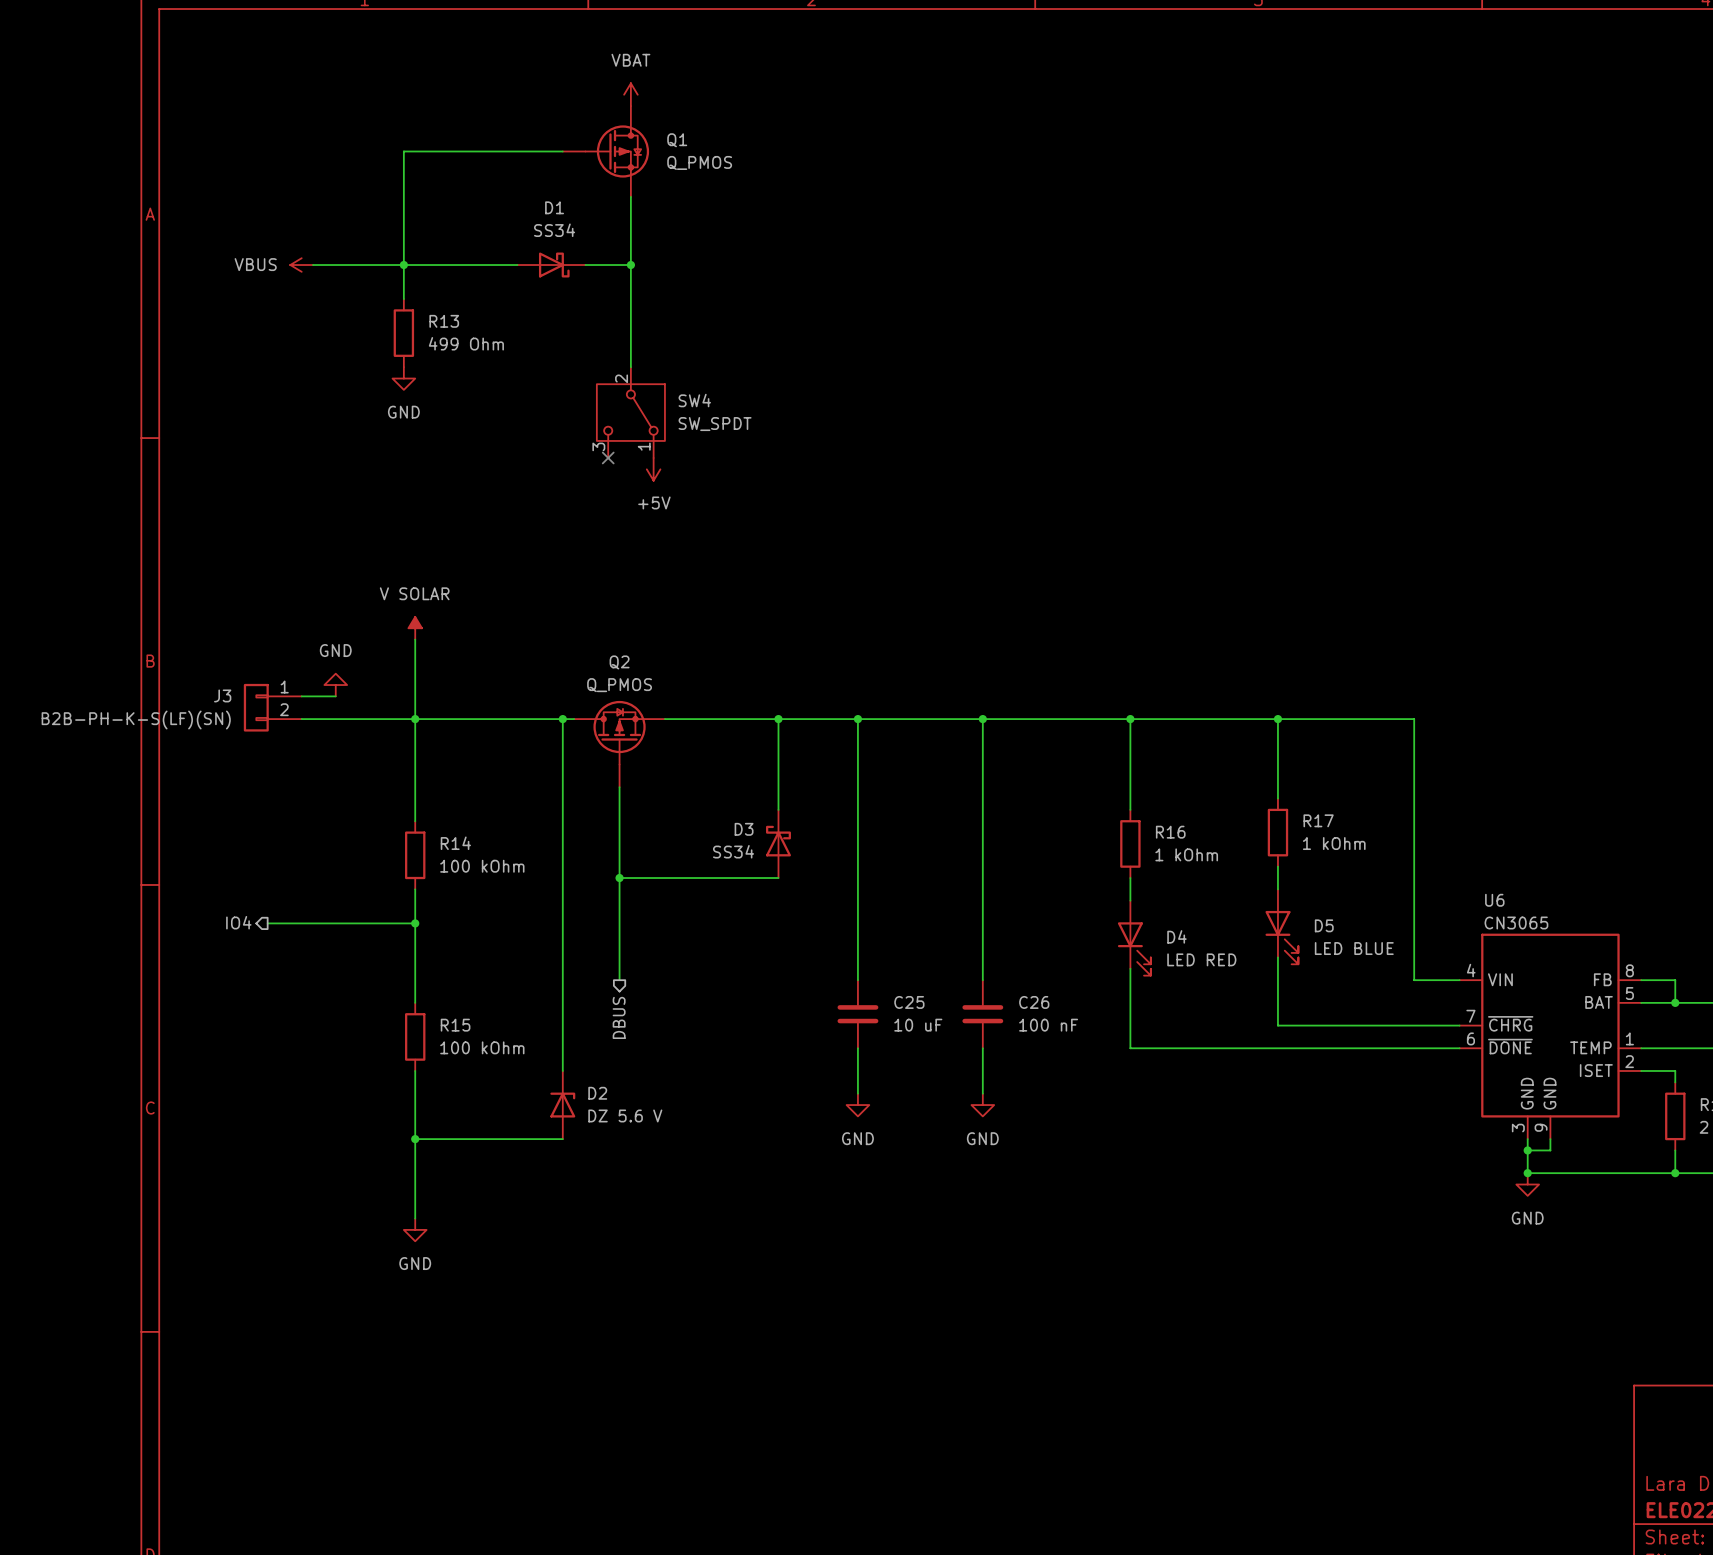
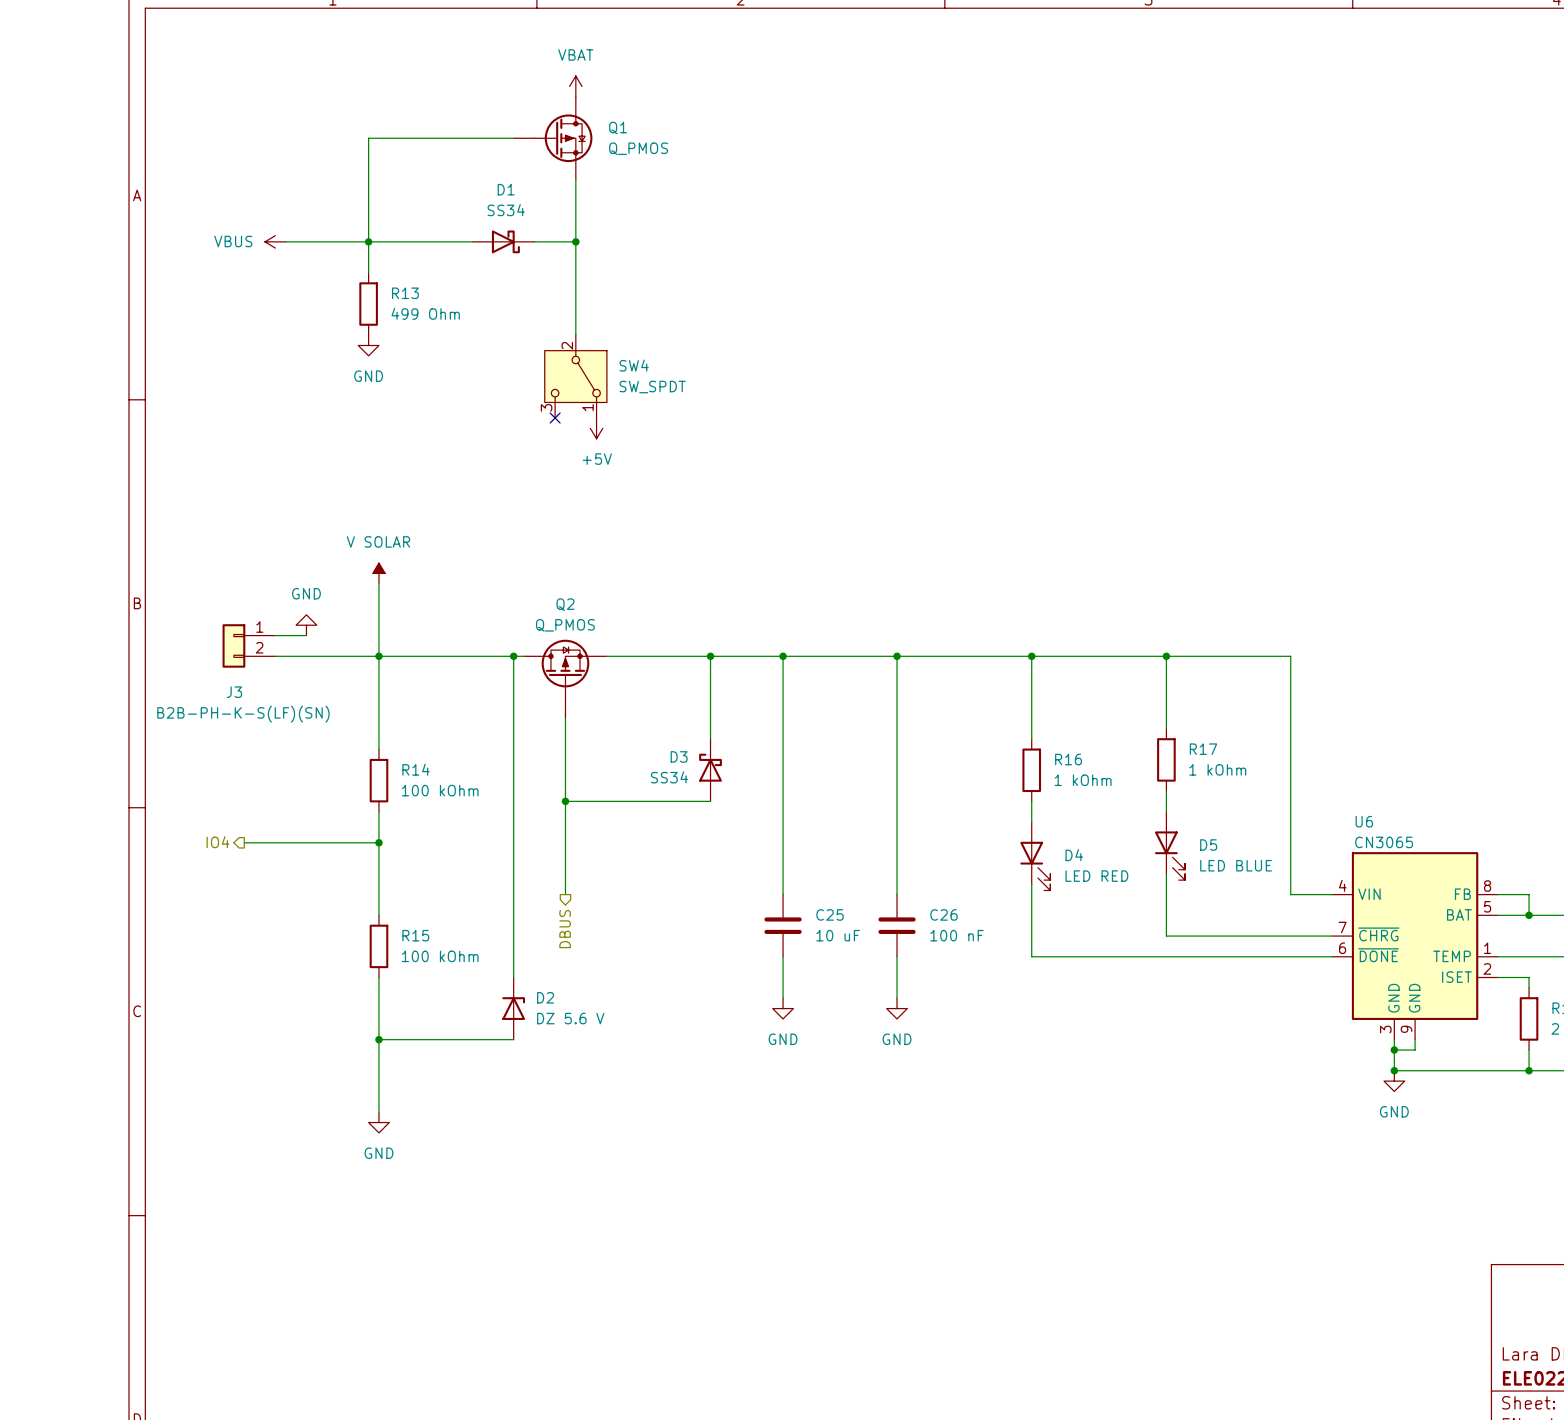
J3 name position: J3 (222, 695) -> J3 (234, 692)
J3 value position: B2B-PH-K-S(LF)(SN) (136, 720) -> B2B-PH-K-S(LF)(SN) (243, 714)

